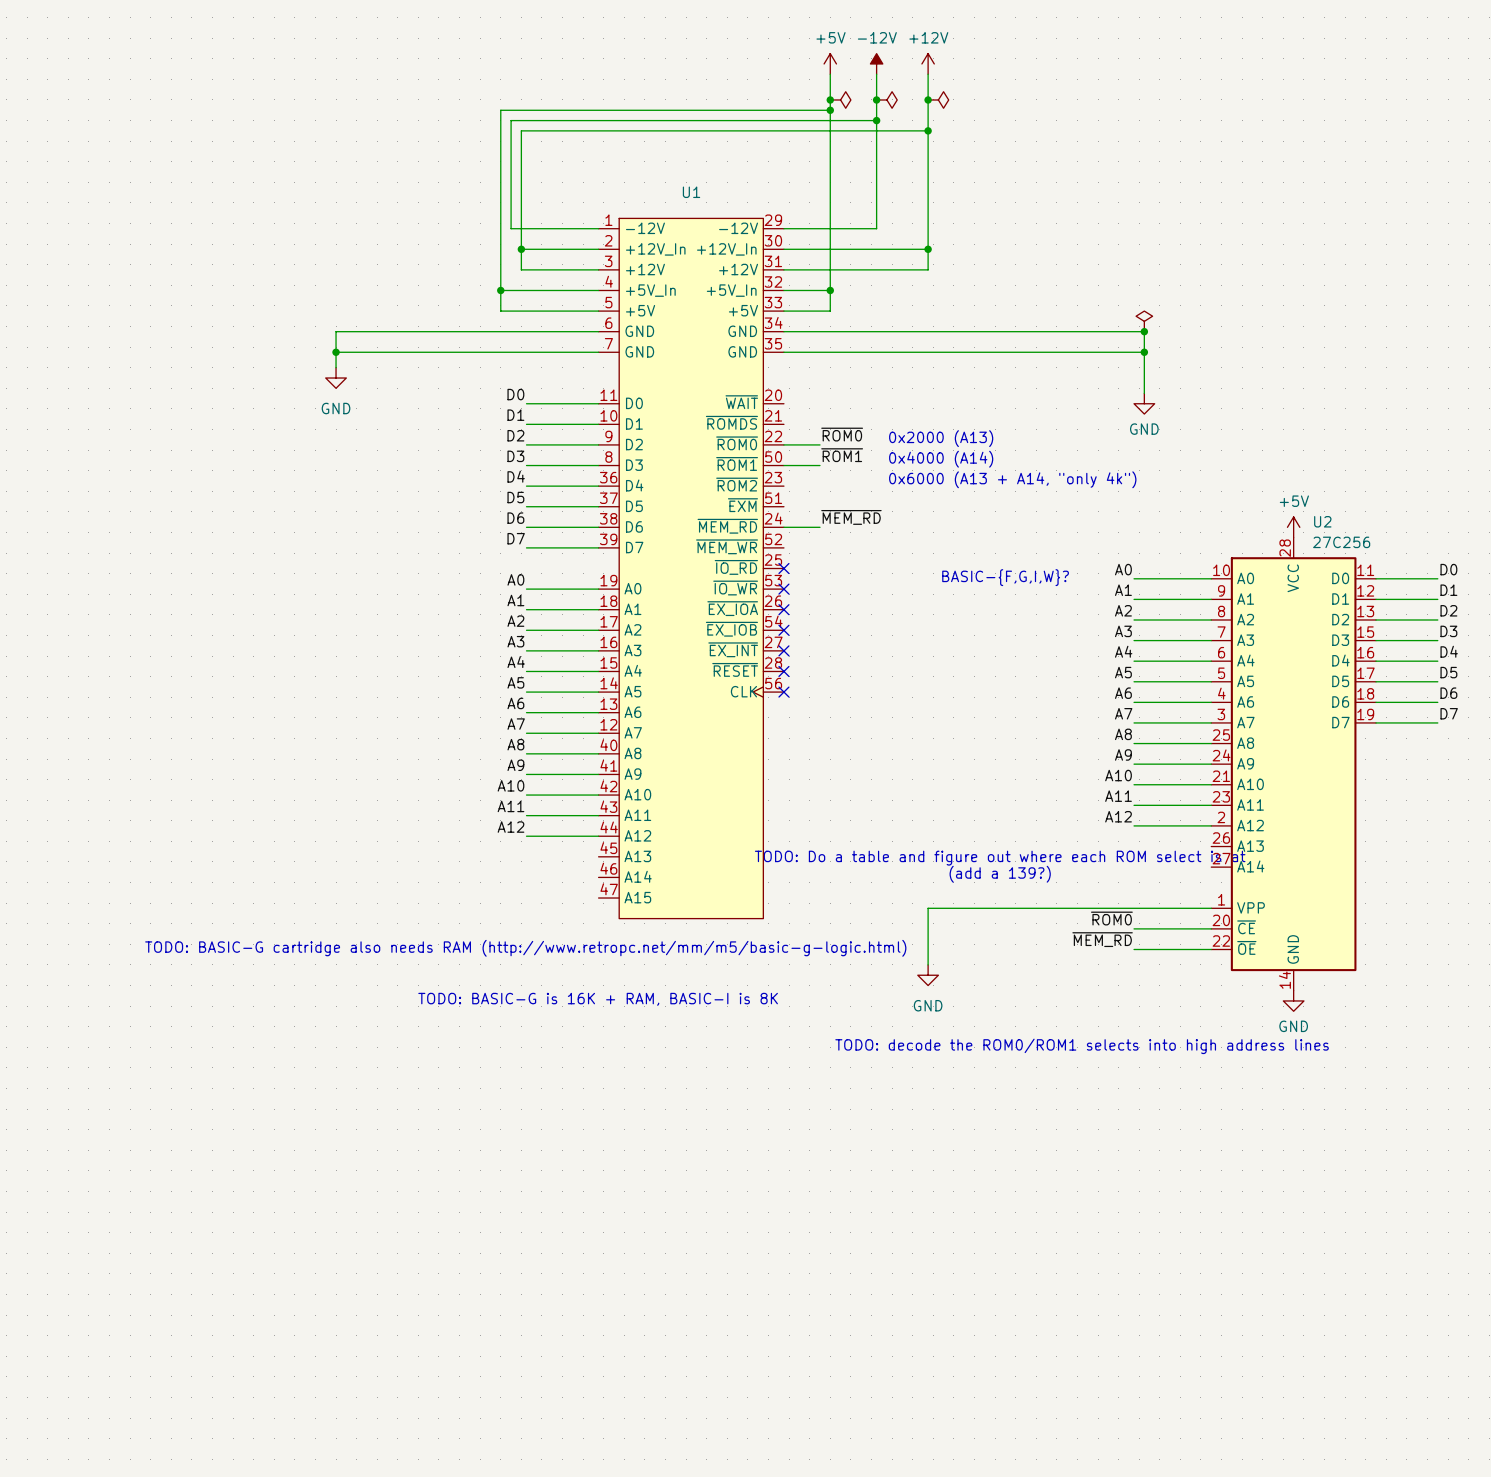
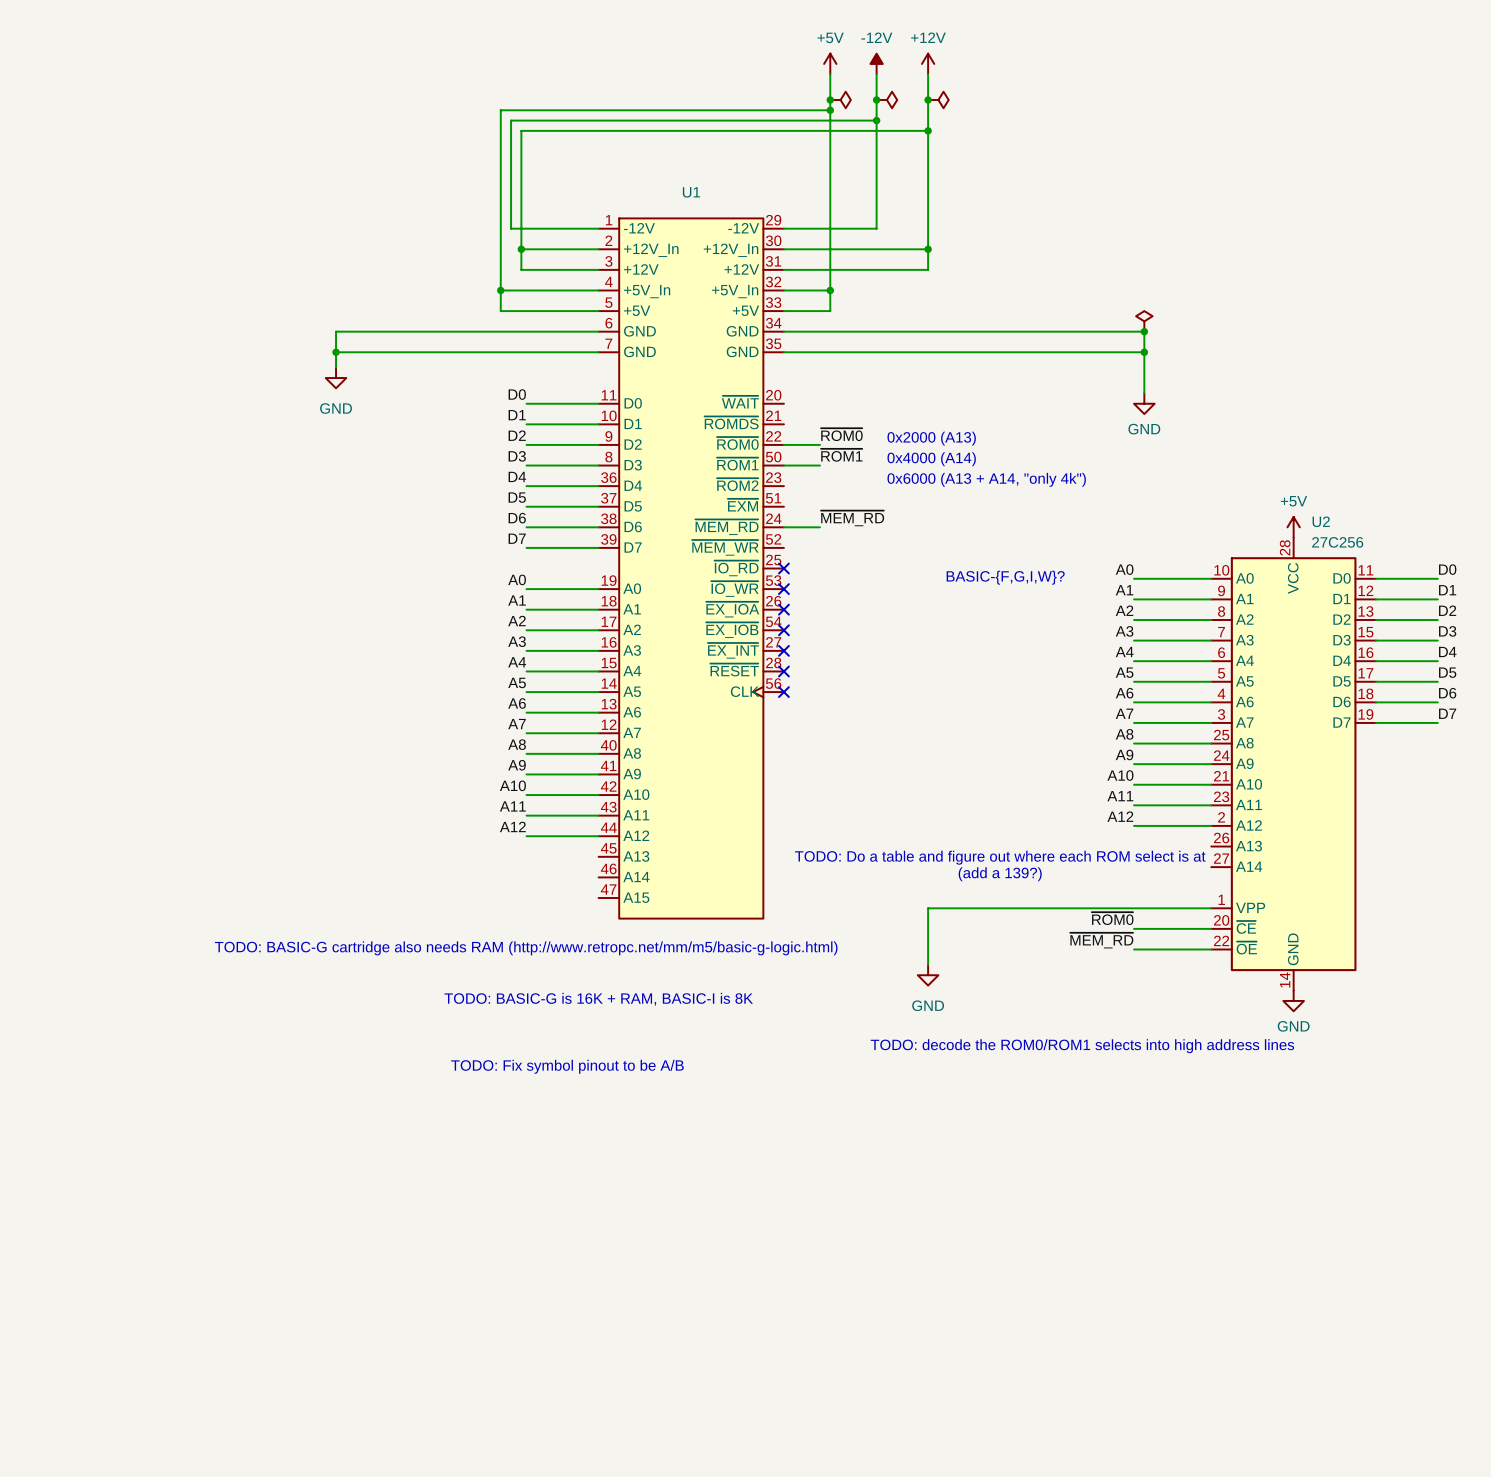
text: none -> TODO: Fix symbol pinout to be A/B (567, 1066)

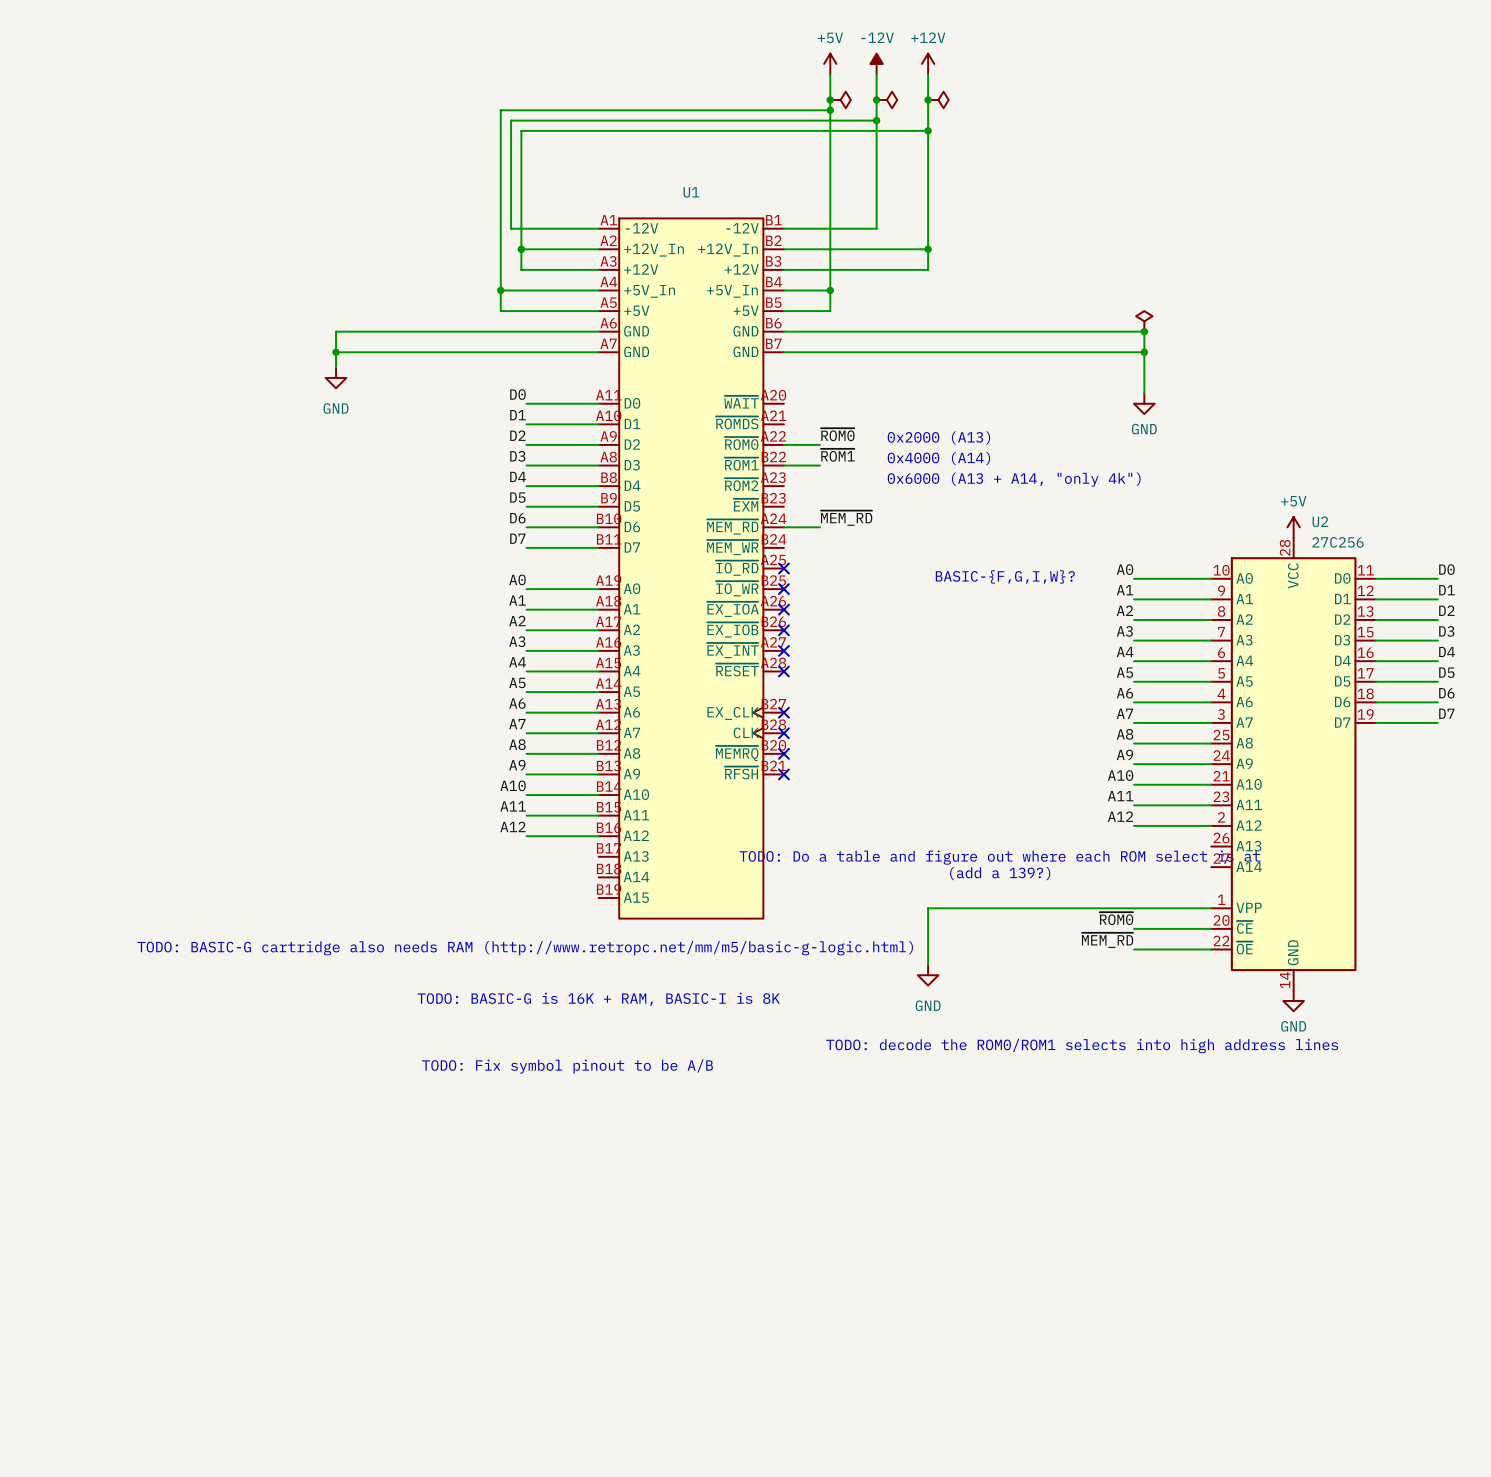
U1 symbol: [598, 218, 784, 919] -> [598, 218, 784, 919]
no-connect mark: (783, 692) -> none
no-connect mark: none -> (783, 712)
no-connect mark: none -> (783, 733)
no-connect mark: none -> (783, 753)
no-connect mark: none -> (783, 774)

